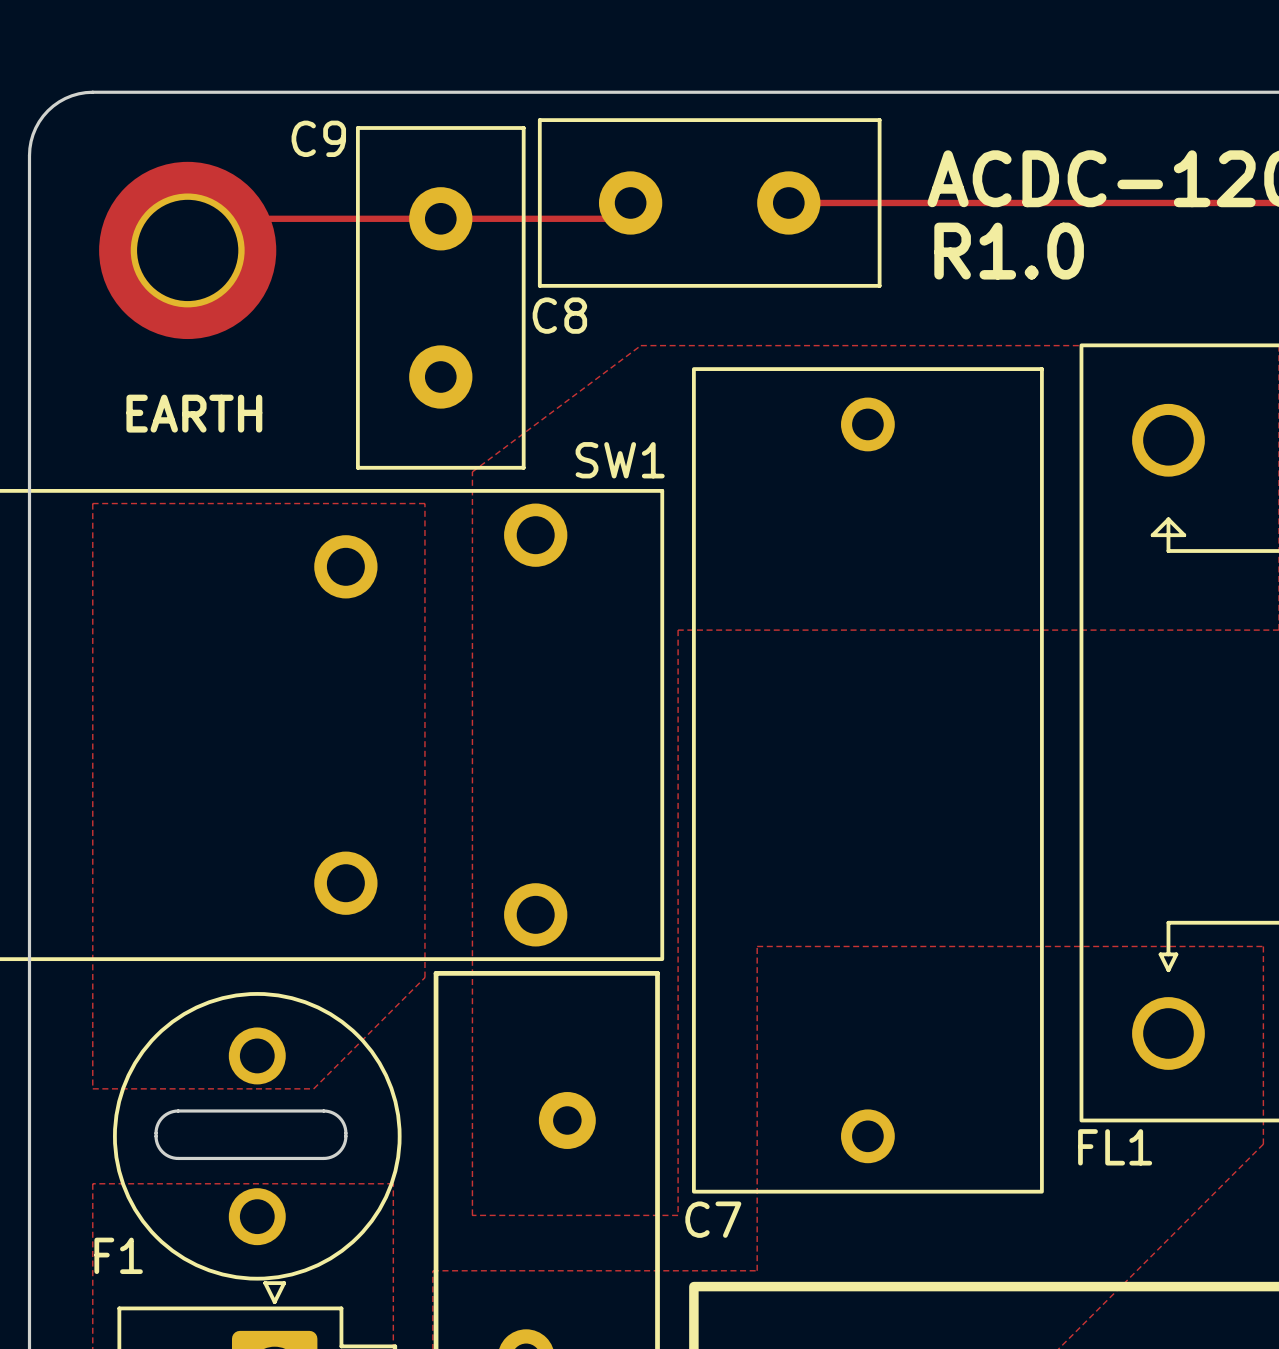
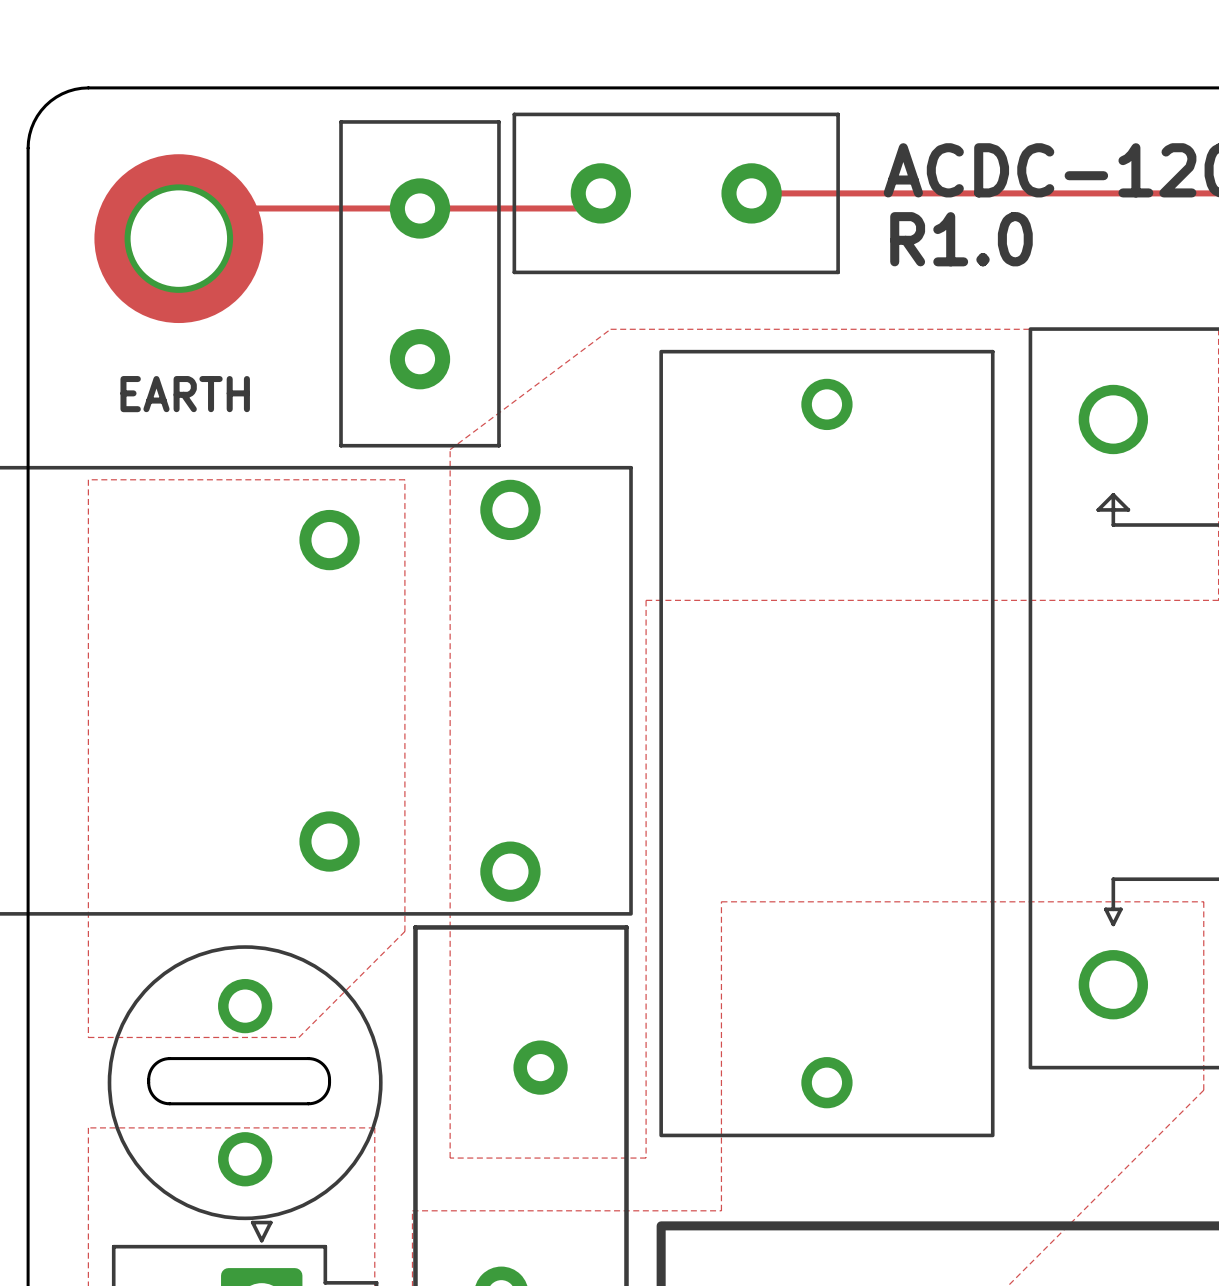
C9 name: C9 (318, 138) -> none
C8 name: C8 (559, 315) -> none
SW1 name: SW1 (620, 460) -> none
FL1 name: FL1 (1115, 1147) -> none
C7 name: C7 (713, 1219) -> none
F1 name: F1 (118, 1255) -> none

